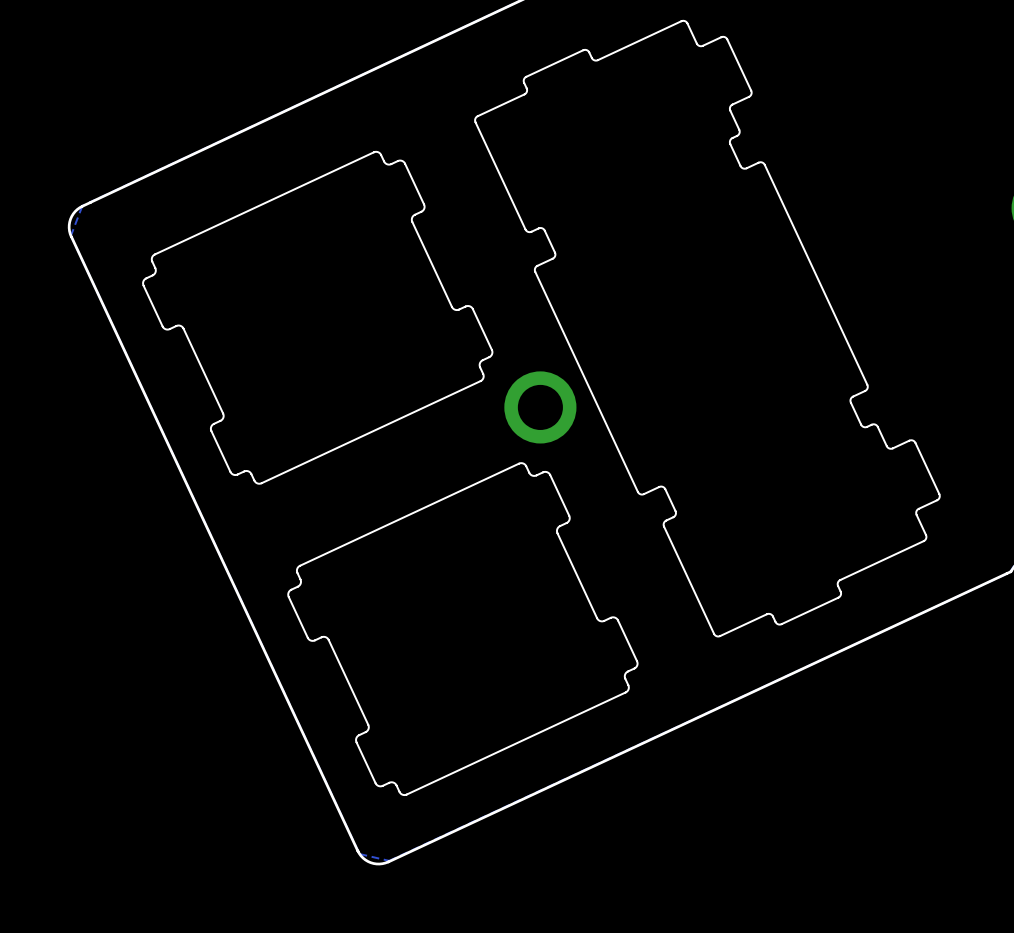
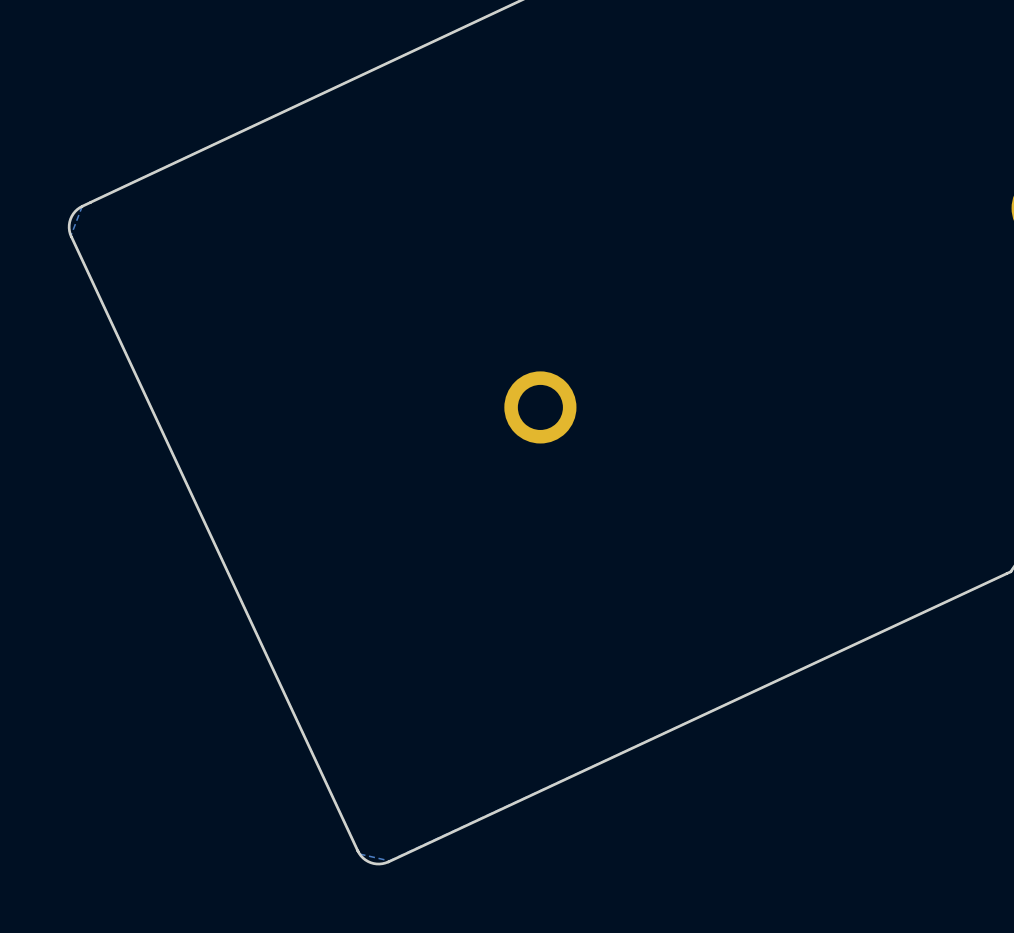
drawing: [142, 19, 941, 796] -> none

